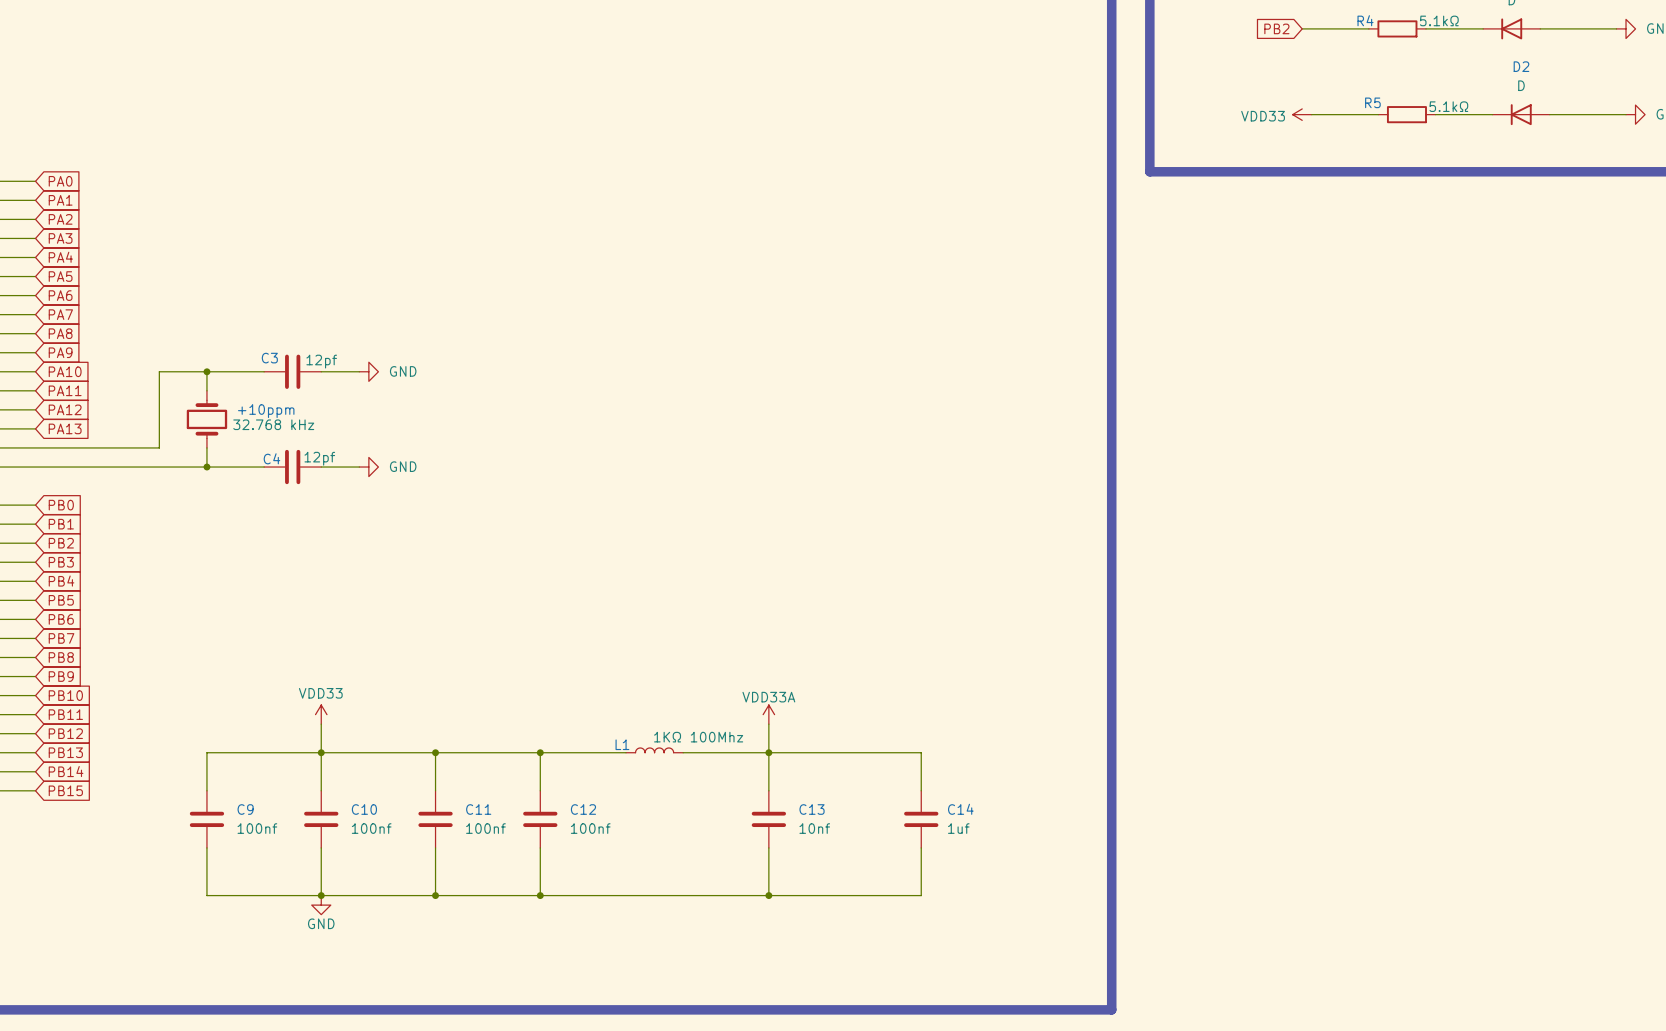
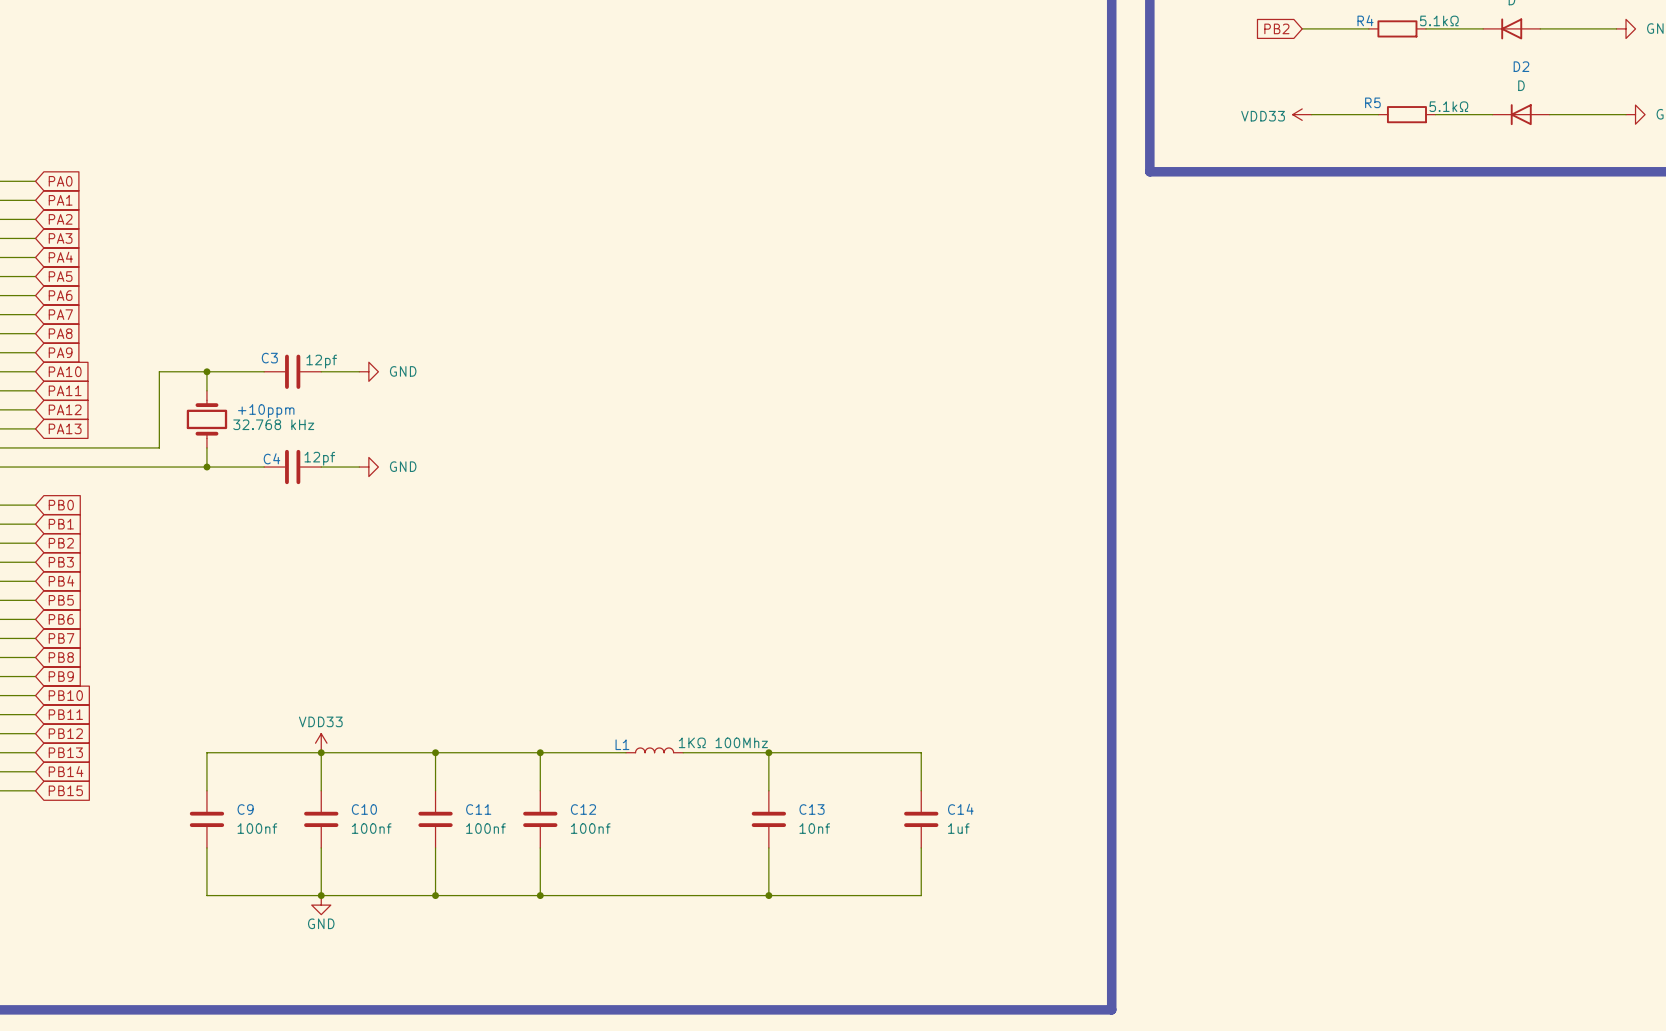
power symbol position: VDD33 (321, 714) -> VDD33 (321, 743)
power symbol: VDD33A (768, 714) -> none
wire: (768, 724) (768, 752) -> none
L1 value position: 1KΩ 100Mhz (698, 737) -> 1KΩ 100Mhz (723, 742)

